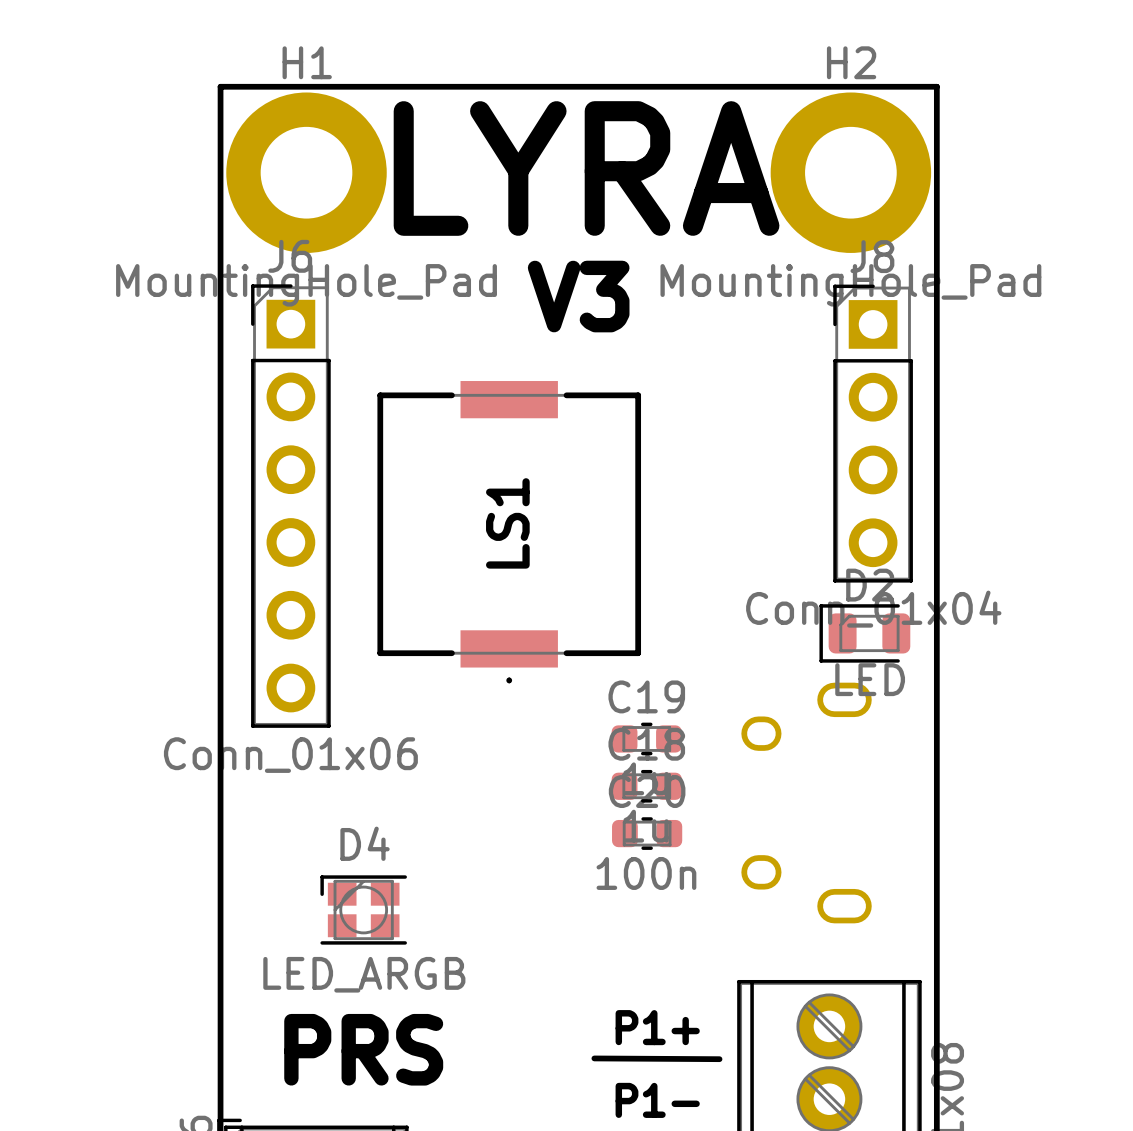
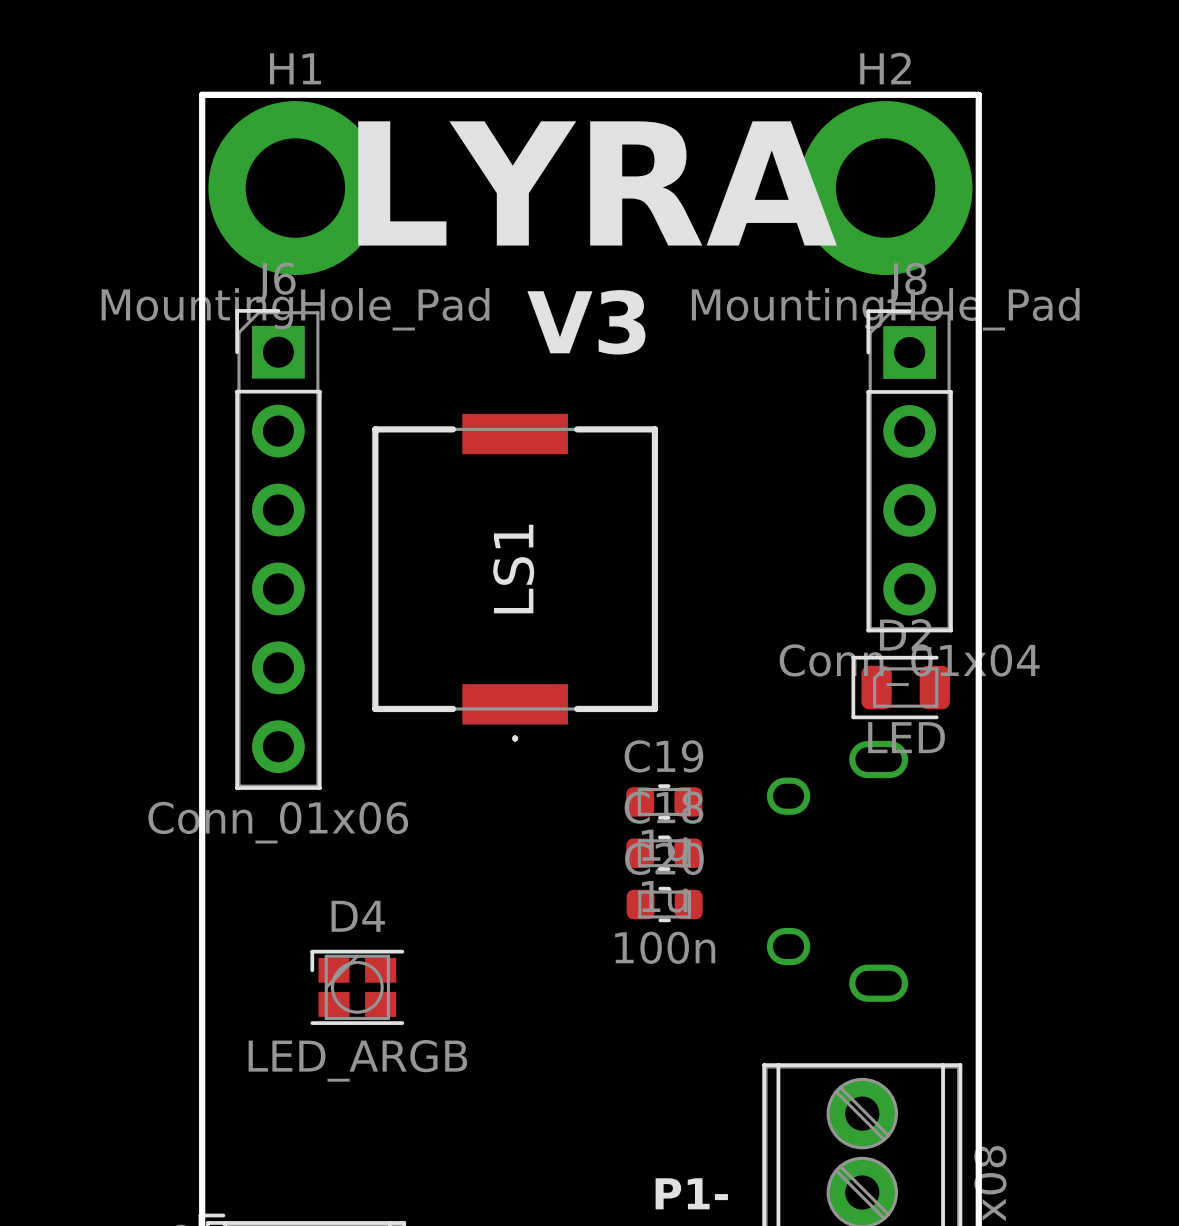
text: P1+ (657, 1027) -> none
text: PRS (363, 1049) -> none
line: (594, 1058) (719, 1059) -> none

